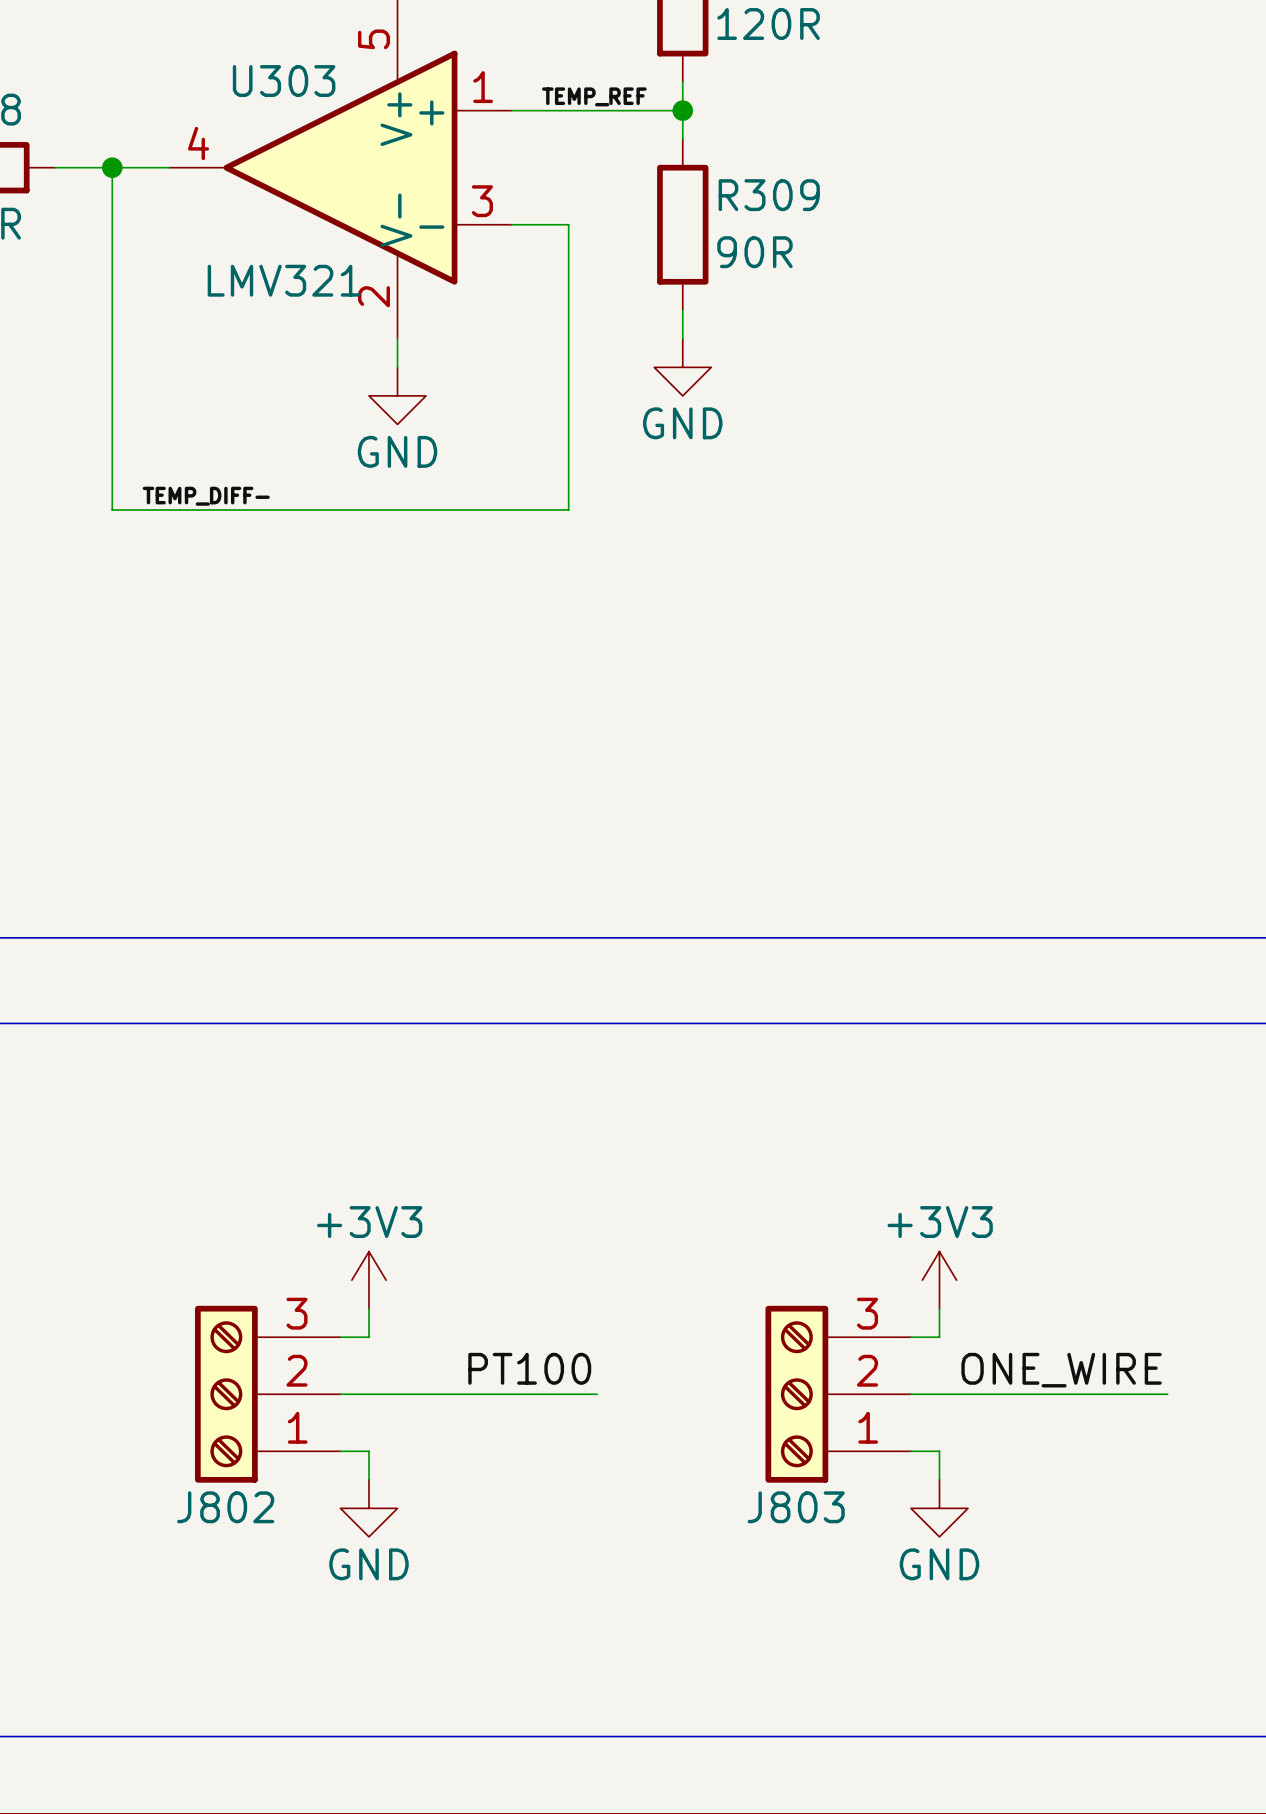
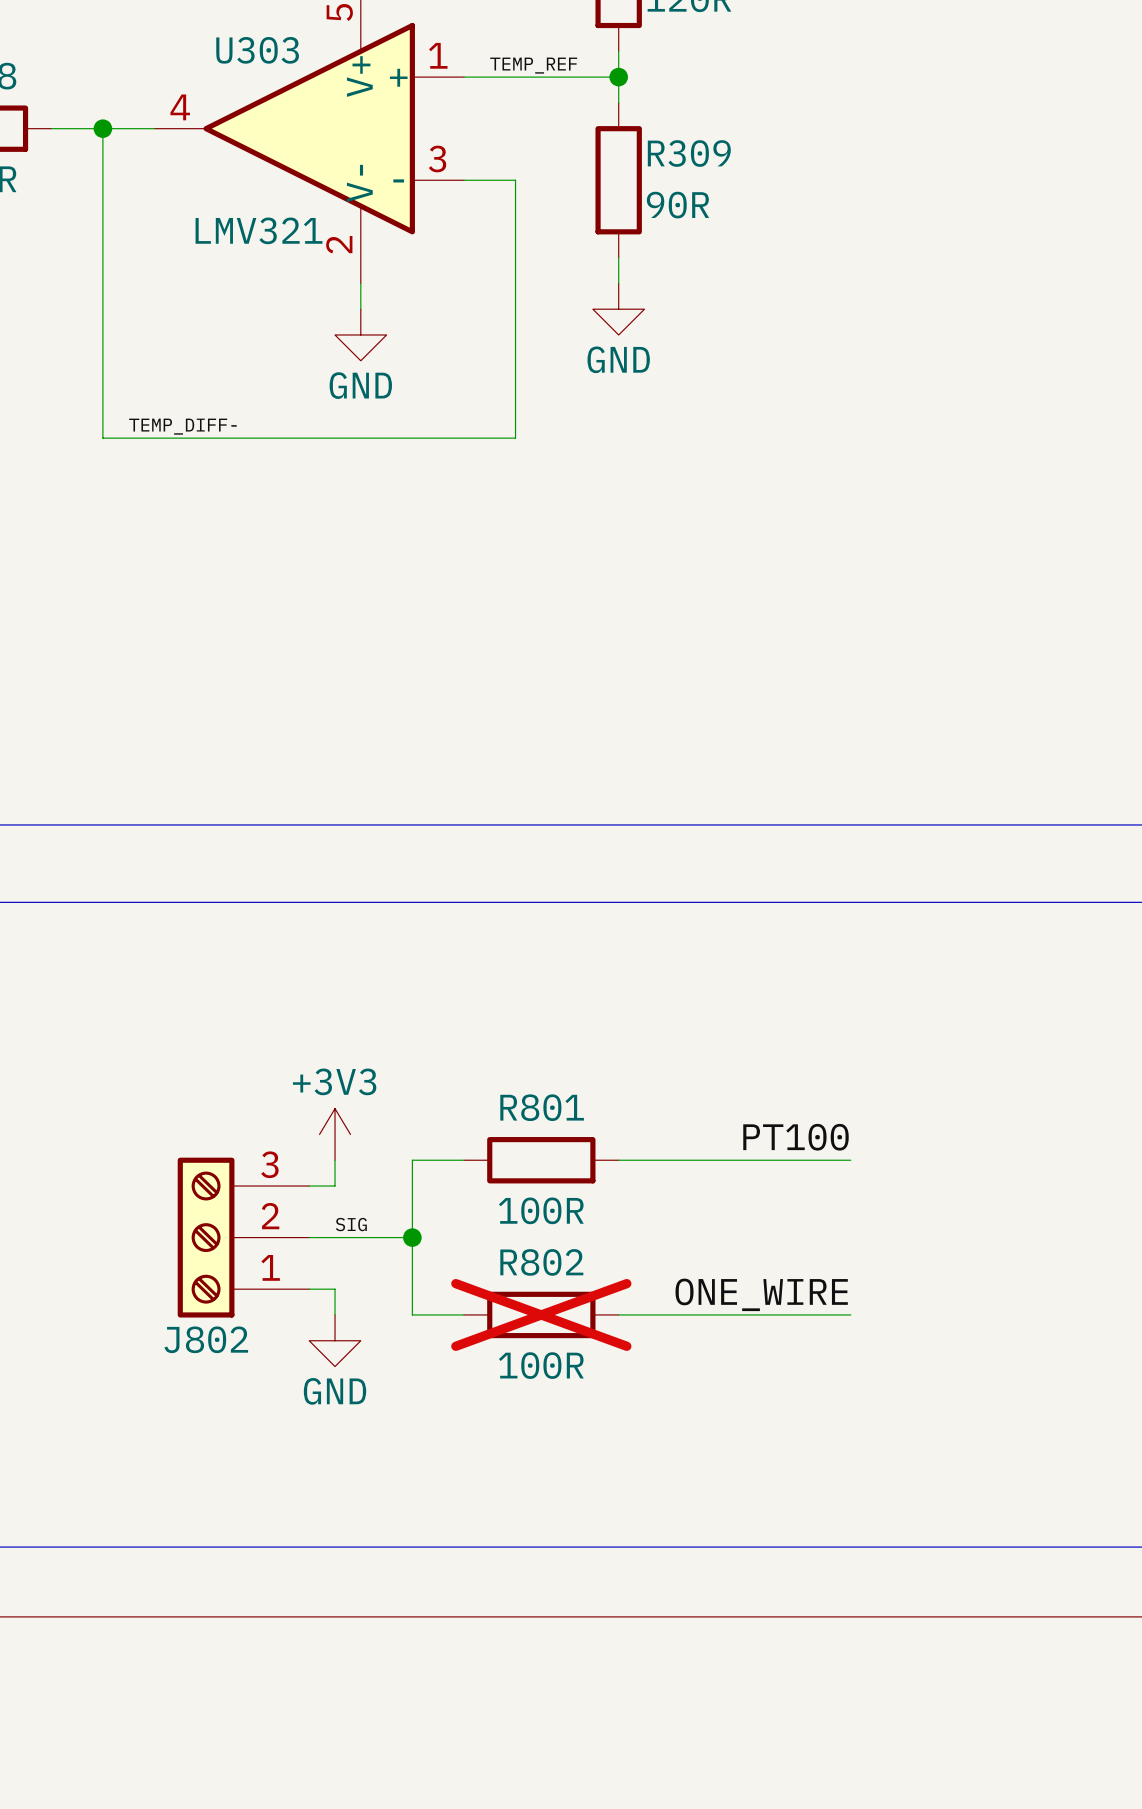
power symbol: +3V3 (939, 1280) -> none
wire: none -> (463, 1160) (412, 1160) (412, 1314) (463, 1314)
R801: none -> 100R (541, 1160)
wire: (939, 1308) (939, 1337) (910, 1337) -> (850, 1160) (618, 1160)
label position: PT100 (529, 1368) -> PT100 (796, 1137)
label position: ONE_WIRE (1061, 1370) -> ONE_WIRE (761, 1294)
label: none -> SIG (351, 1224)
wire: (454, 1394) (597, 1394) -> none
junction: none -> (412, 1237)
J803: (838, 1394) -> none
wire: (910, 1394) (1167, 1394) -> none
wire: (910, 1451) (939, 1451) (939, 1479) -> (618, 1314) (850, 1314)
R802: none -> 100R (541, 1314)
power symbol: GND (939, 1508) -> none

